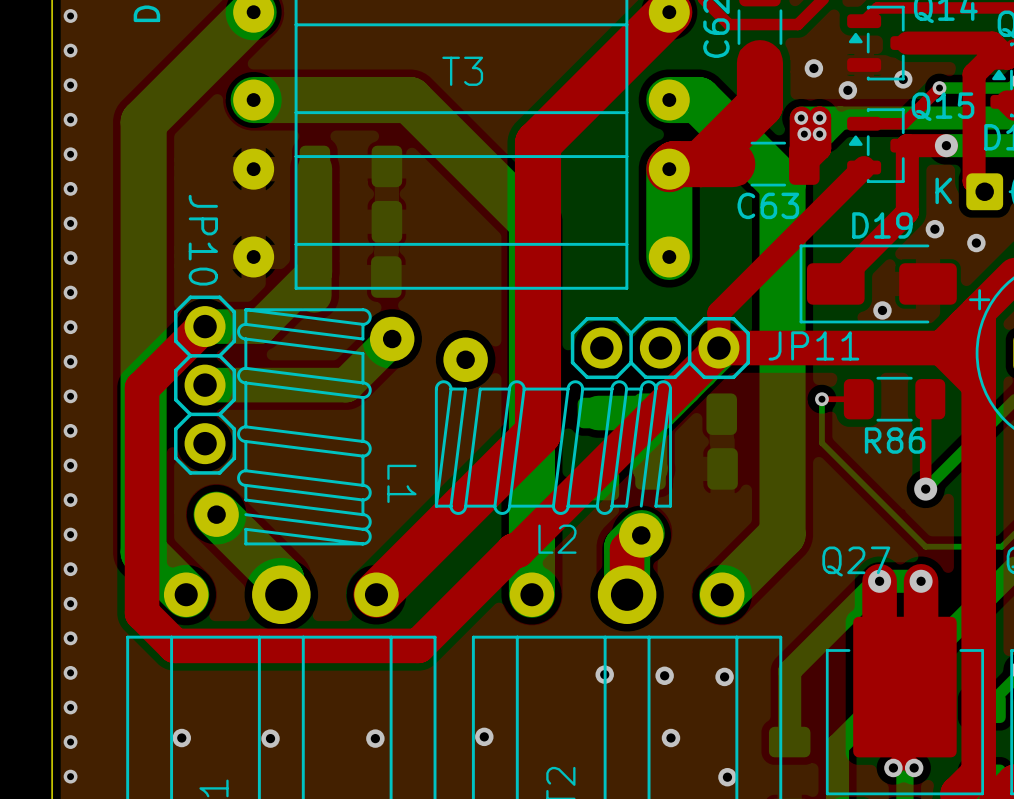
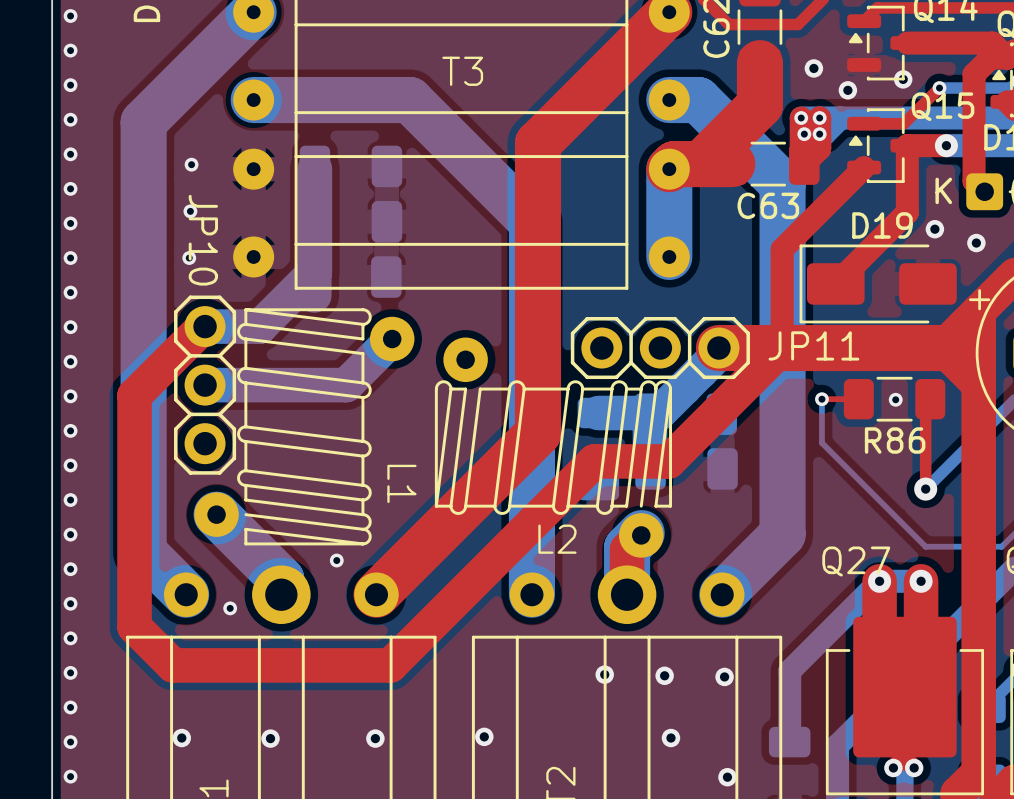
via: none -> (191, 164)
via: none -> (190, 211)
top track: (782, 249) (718, 312) (718, 348) -> none
via: none -> (189, 258)
via: (882, 310) -> none
top track width: thin (718, 348) (942, 348) -> thick (718, 348) (942, 348)
top track: (718, 349) (517, 550) (513, 550) (418, 645) (174, 645) (142, 613) (142, 388) -> (782, 249) (782, 348) (668, 461) (594, 461) (390, 665) (173, 665) (134, 626) (134, 395) (142, 388)
via: none -> (895, 399)
via: none -> (336, 560)
via: none -> (230, 608)

